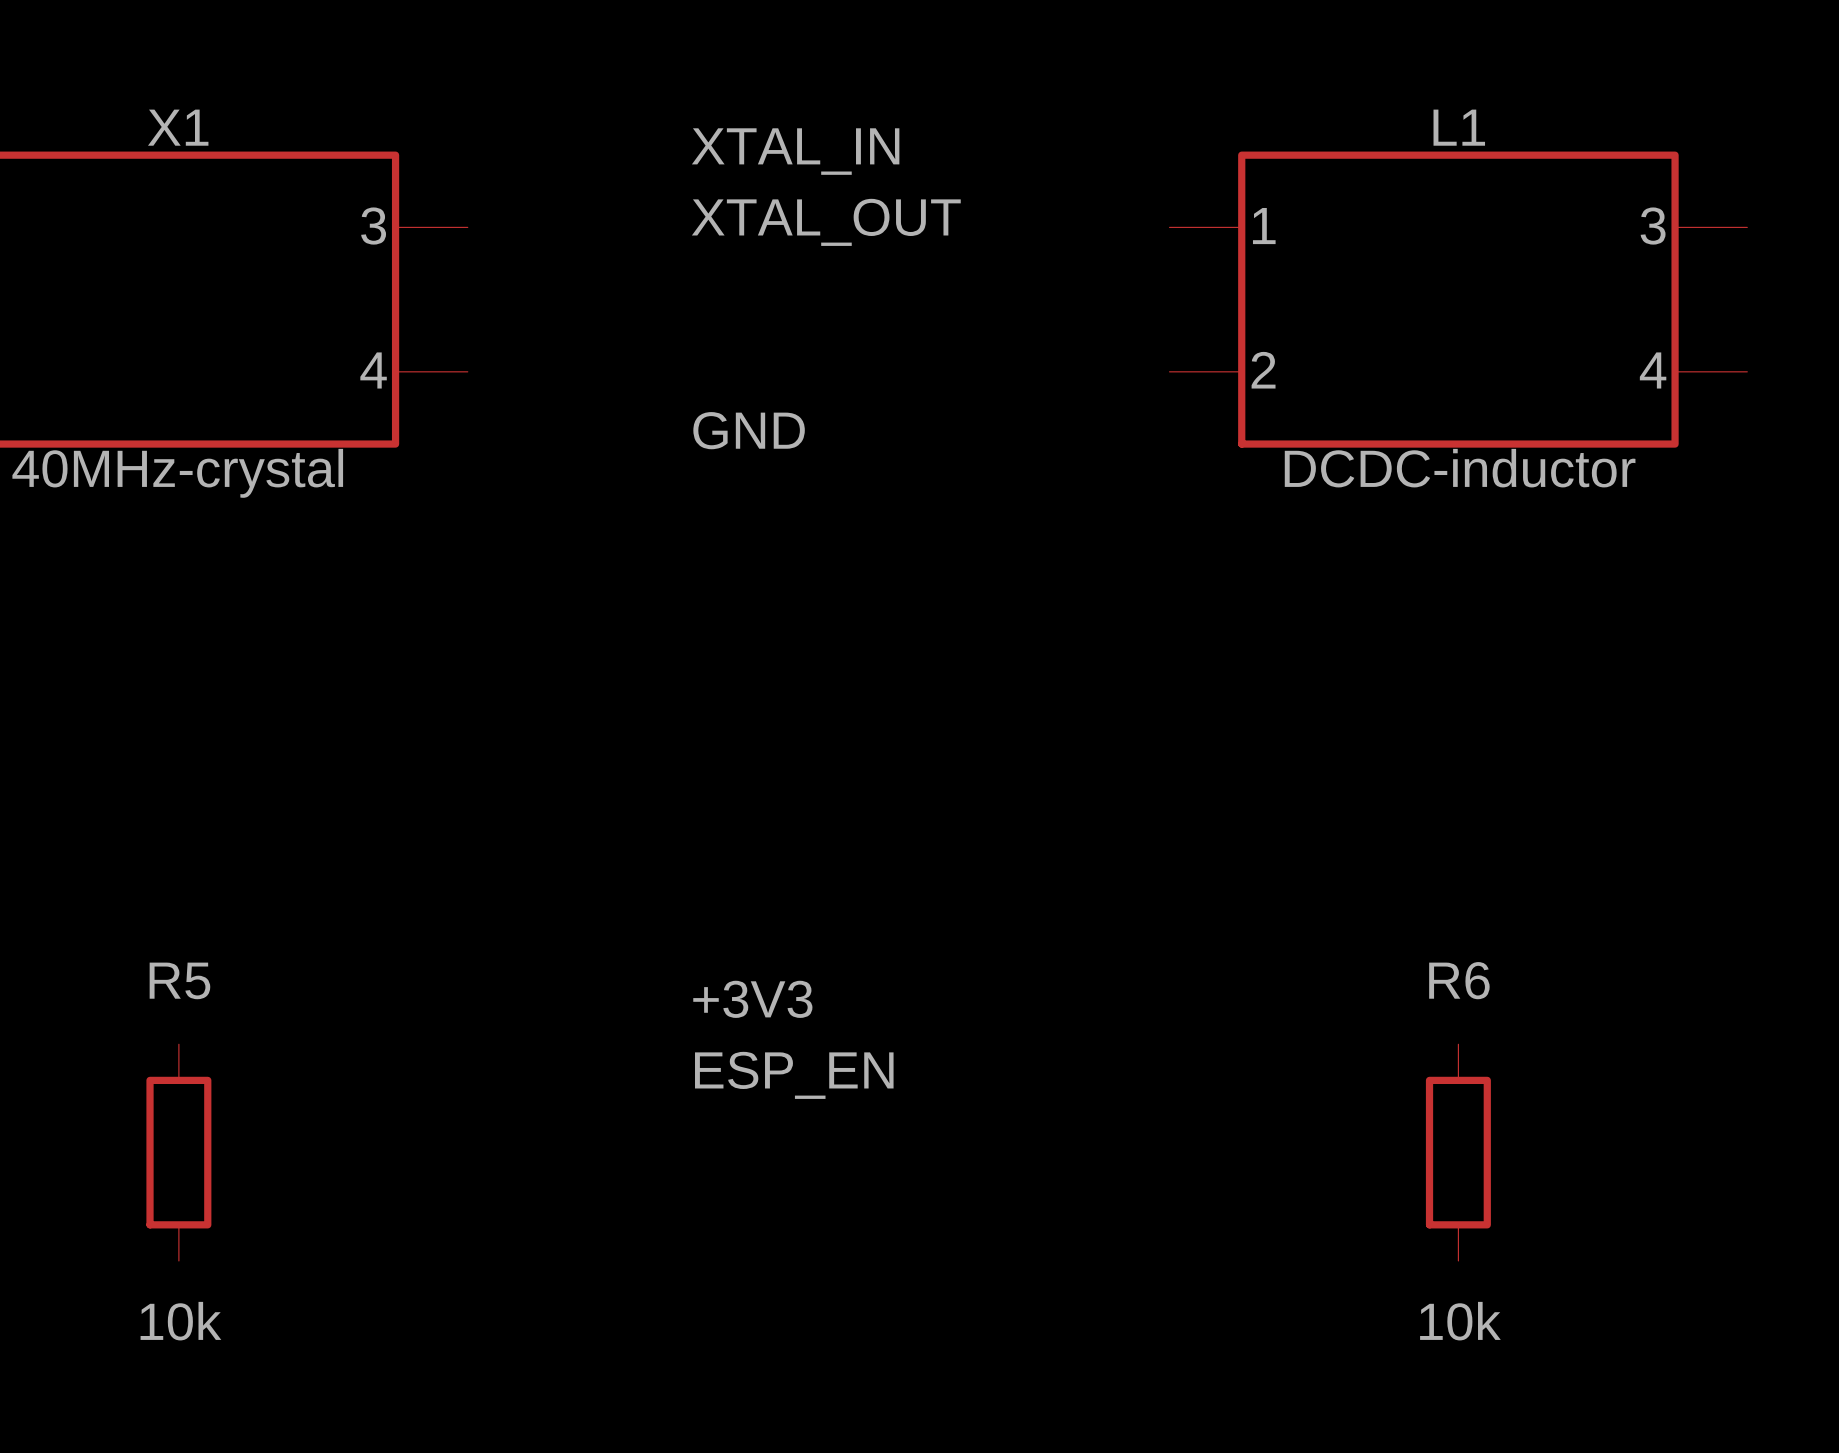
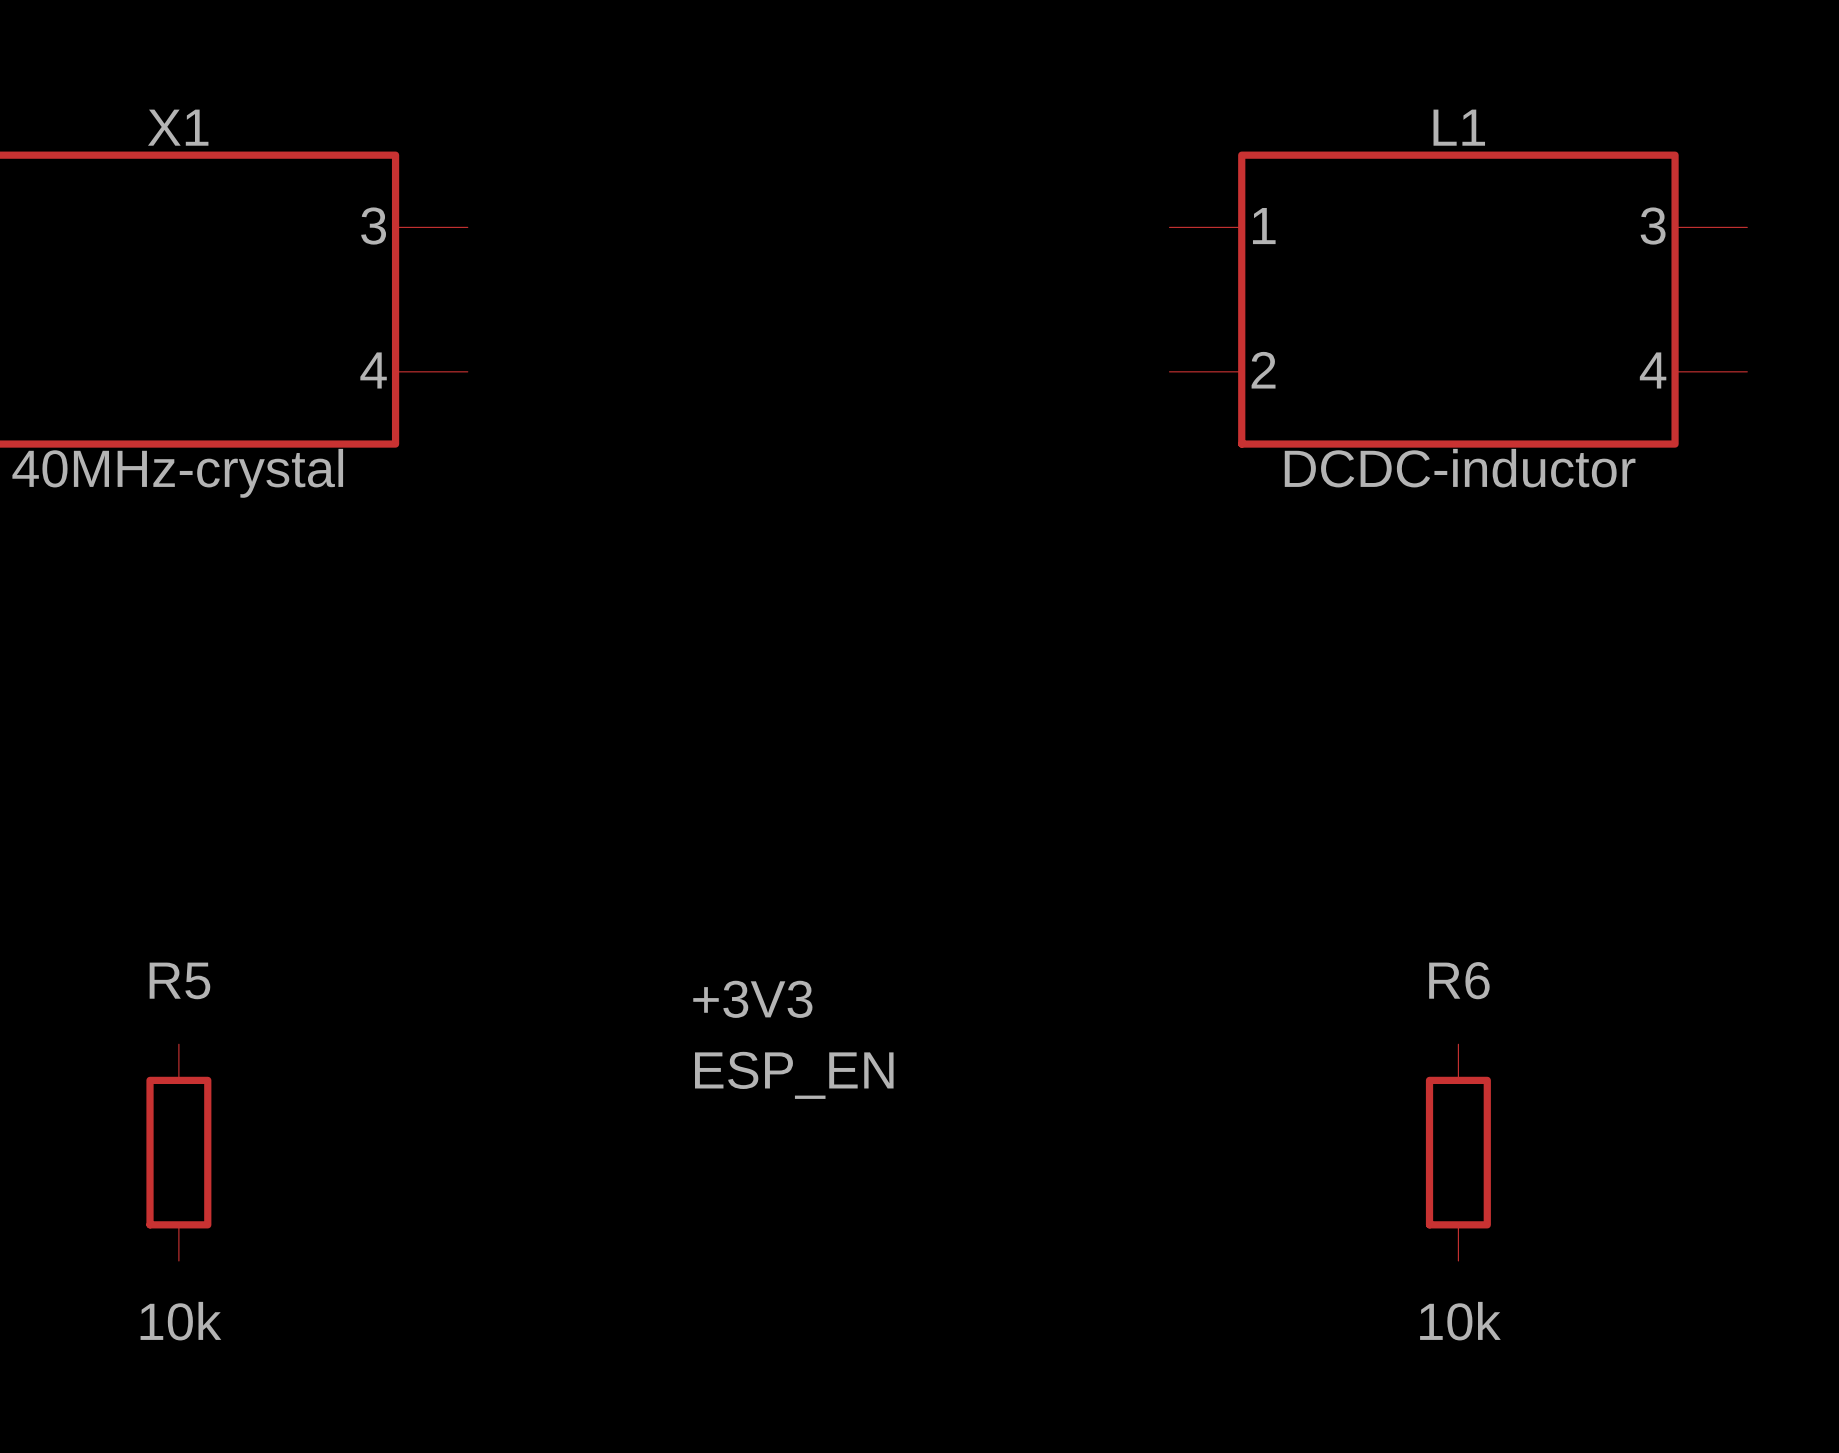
label: XTAL_IN (795, 151) -> none
label: XTAL_OUT (826, 222) -> none
label: GND (749, 430) -> none

